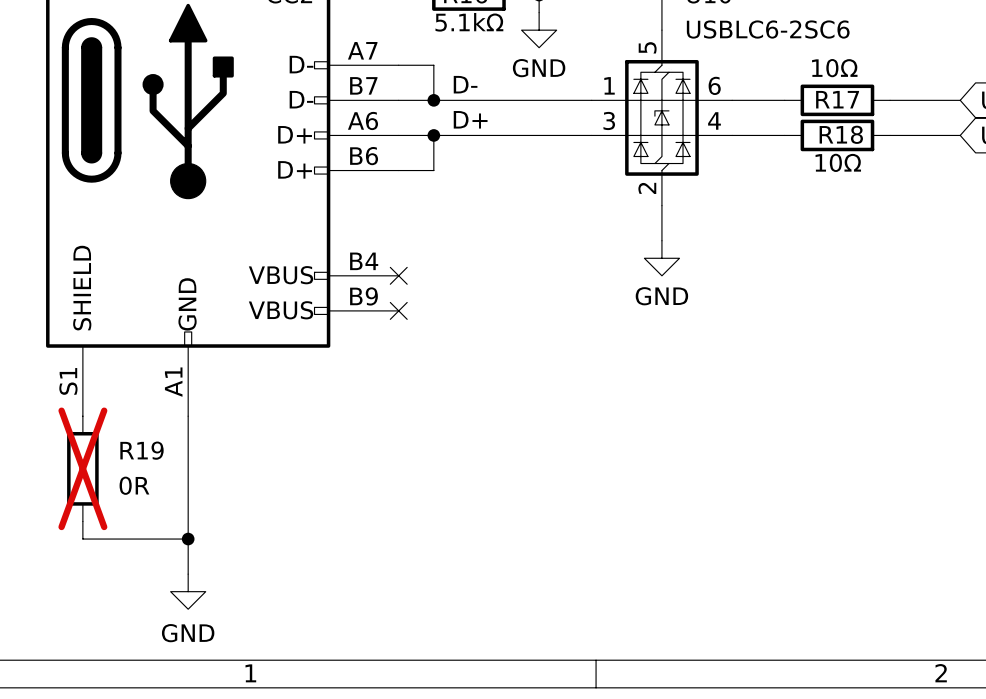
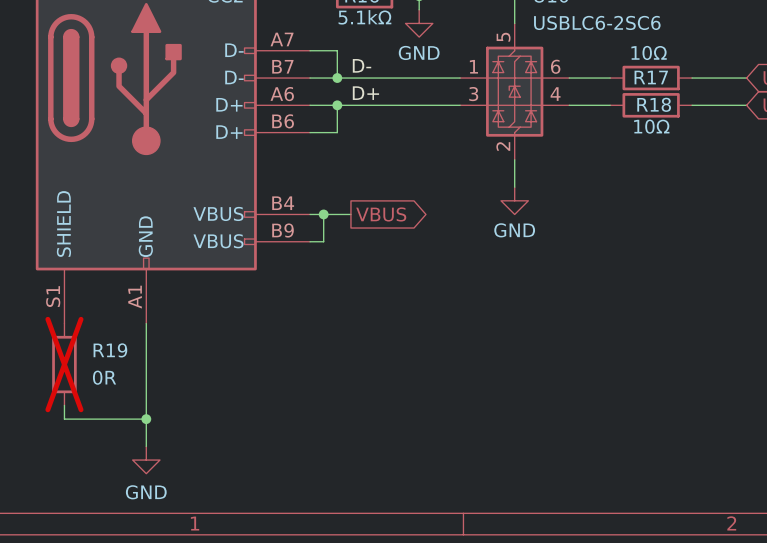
wire: none -> (310, 214) (350, 214)
no-connect mark: (398, 275) -> none
wire: none -> (323, 214) (323, 241) (310, 241)
junction: none -> (323, 214)
global label: none -> VBUS (381, 214)
no-connect mark: (398, 310) -> none

